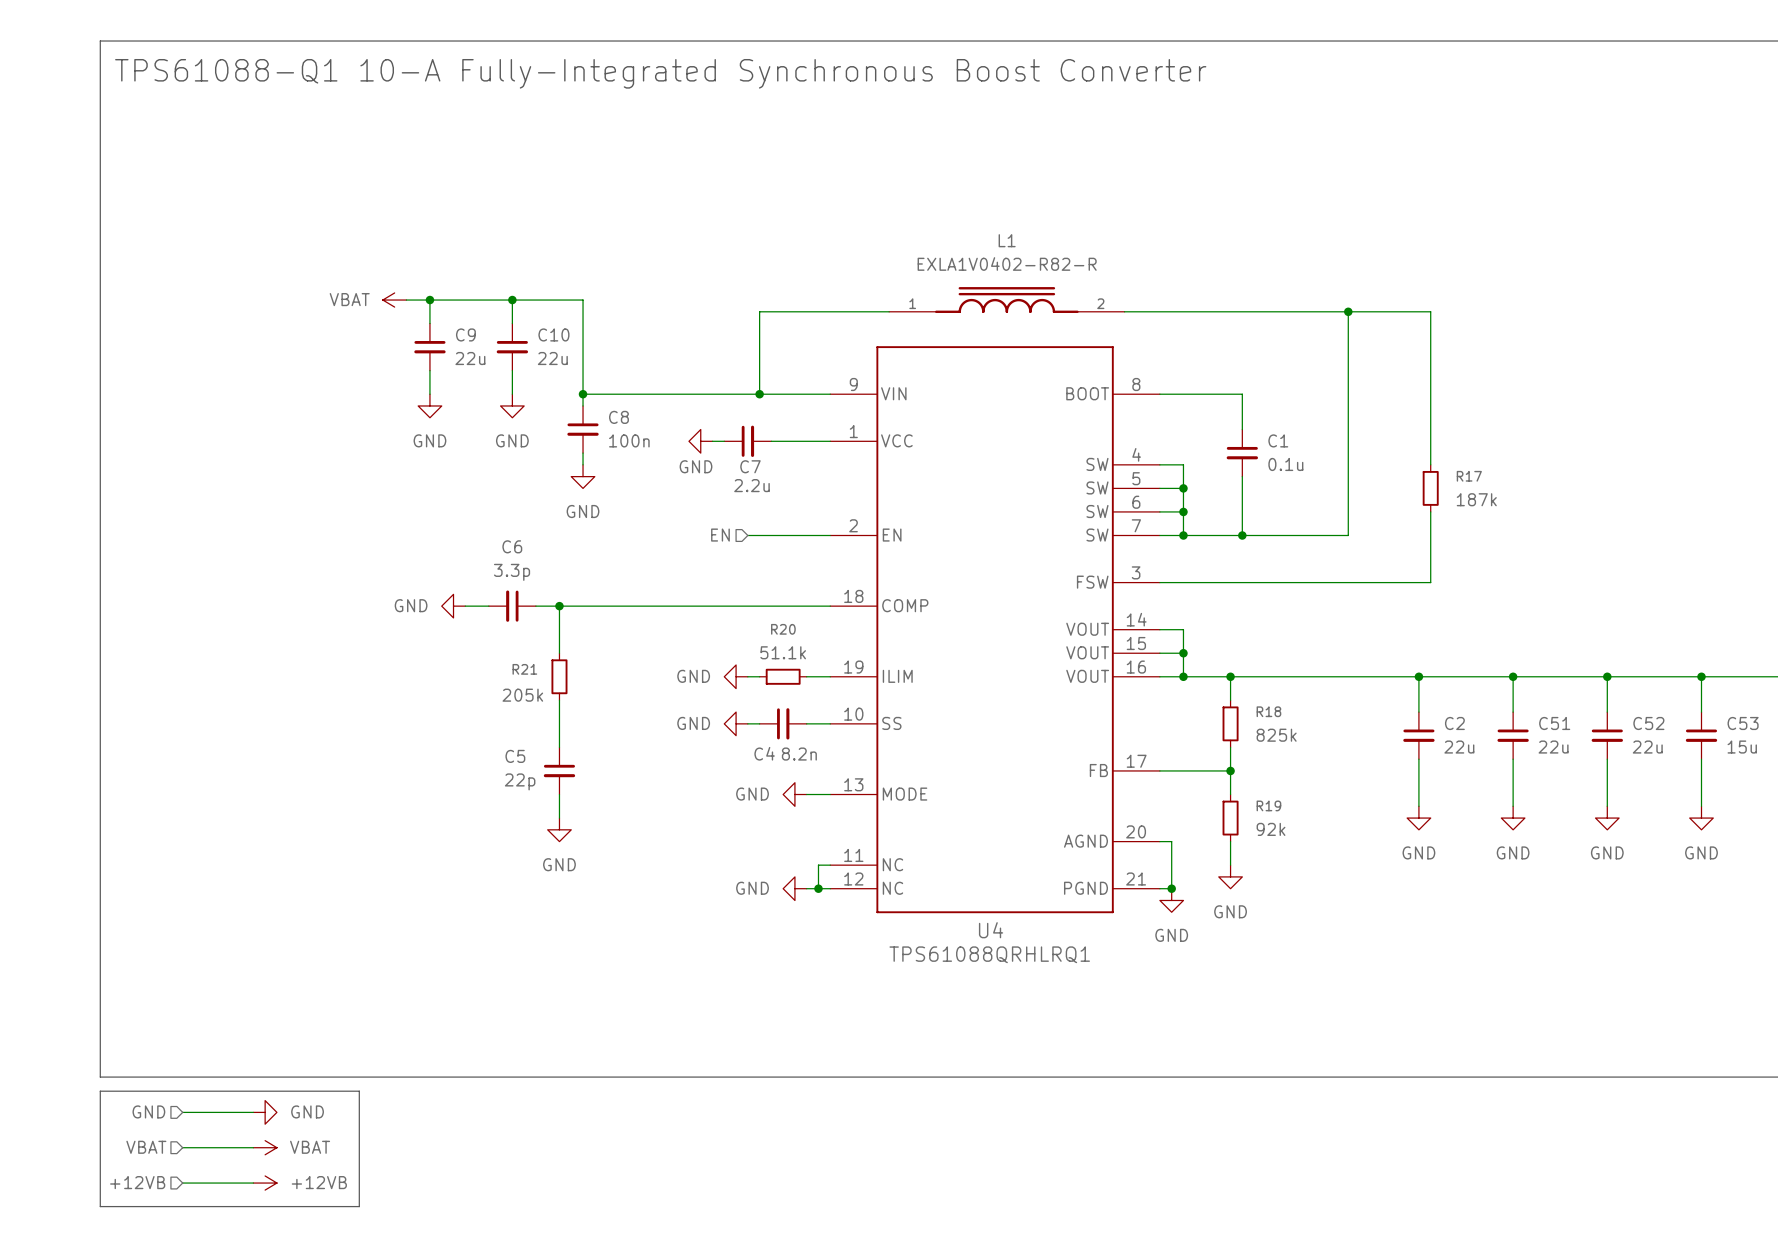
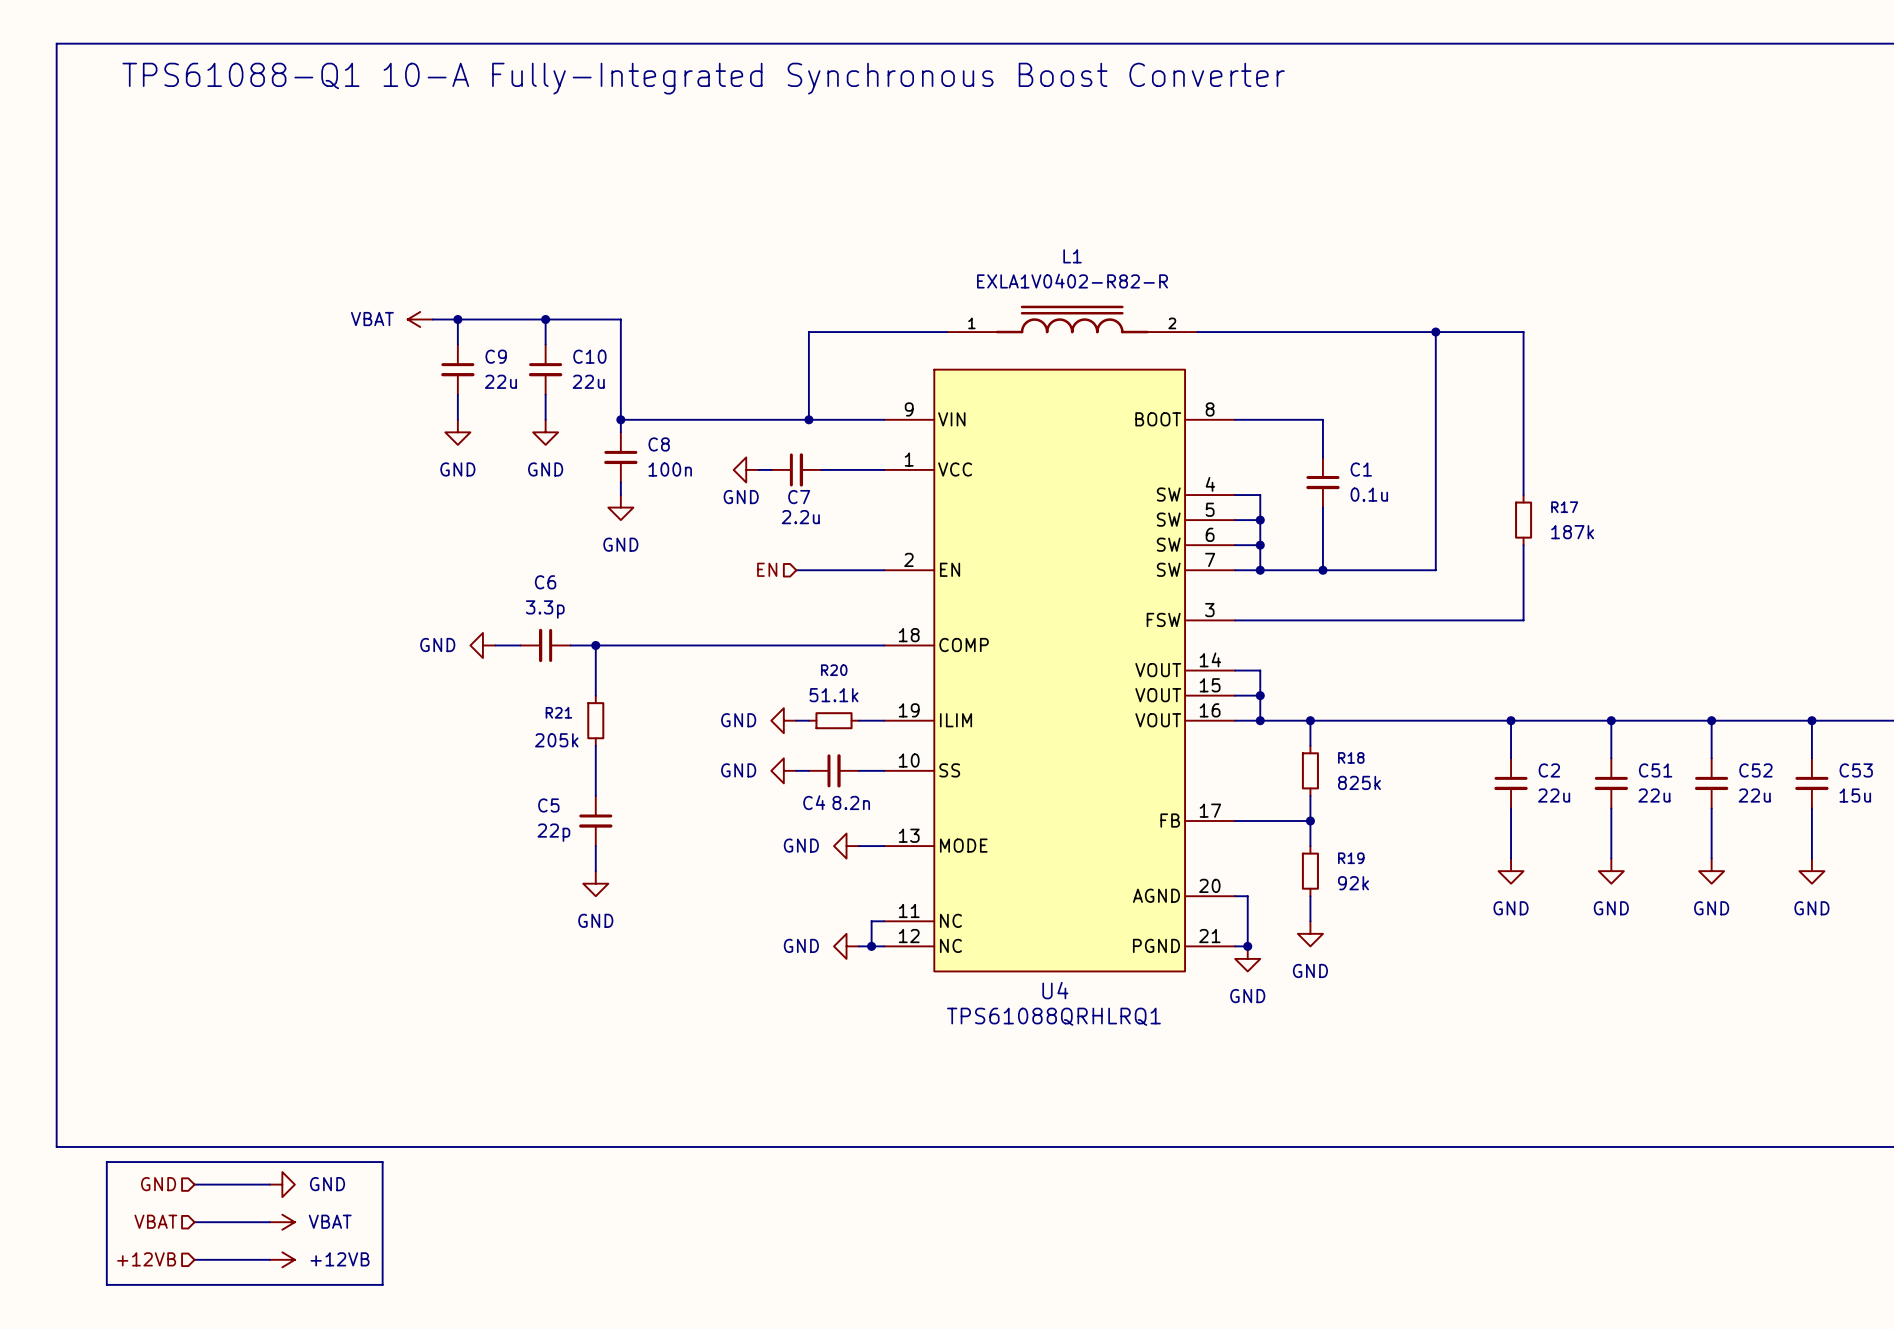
line: (100, 41) (100, 1077) -> (106, 43) (56, 43) (56, 1146) (106, 1146)
U4 symbol: [830, 346, 1160, 914] -> [884, 369, 1236, 972]

